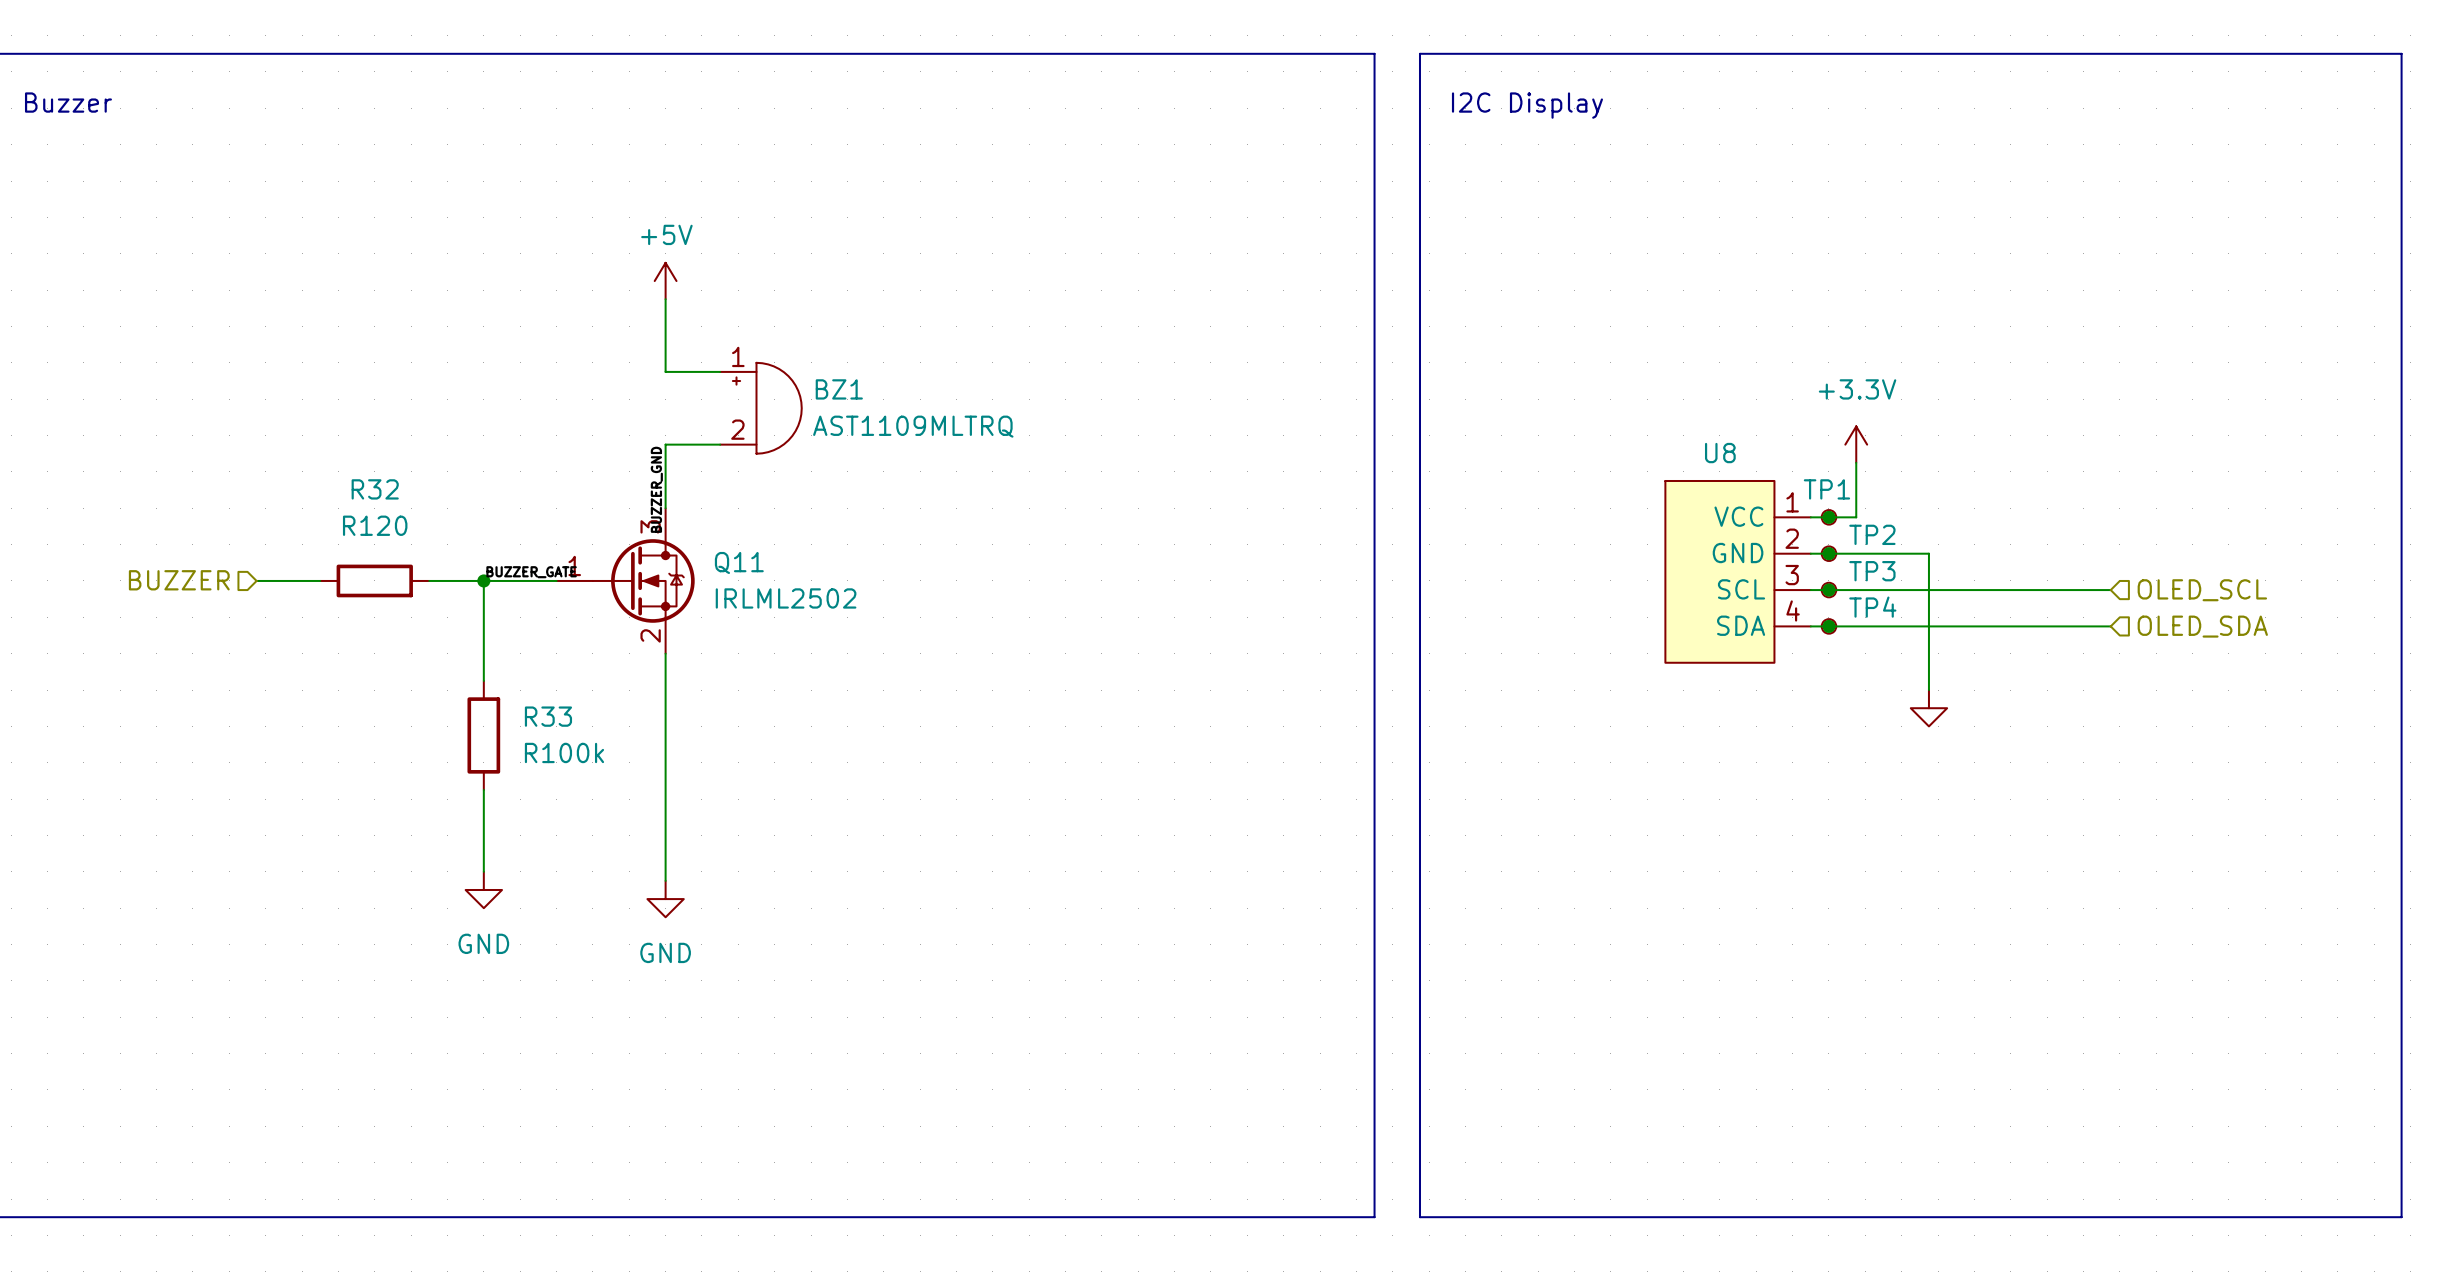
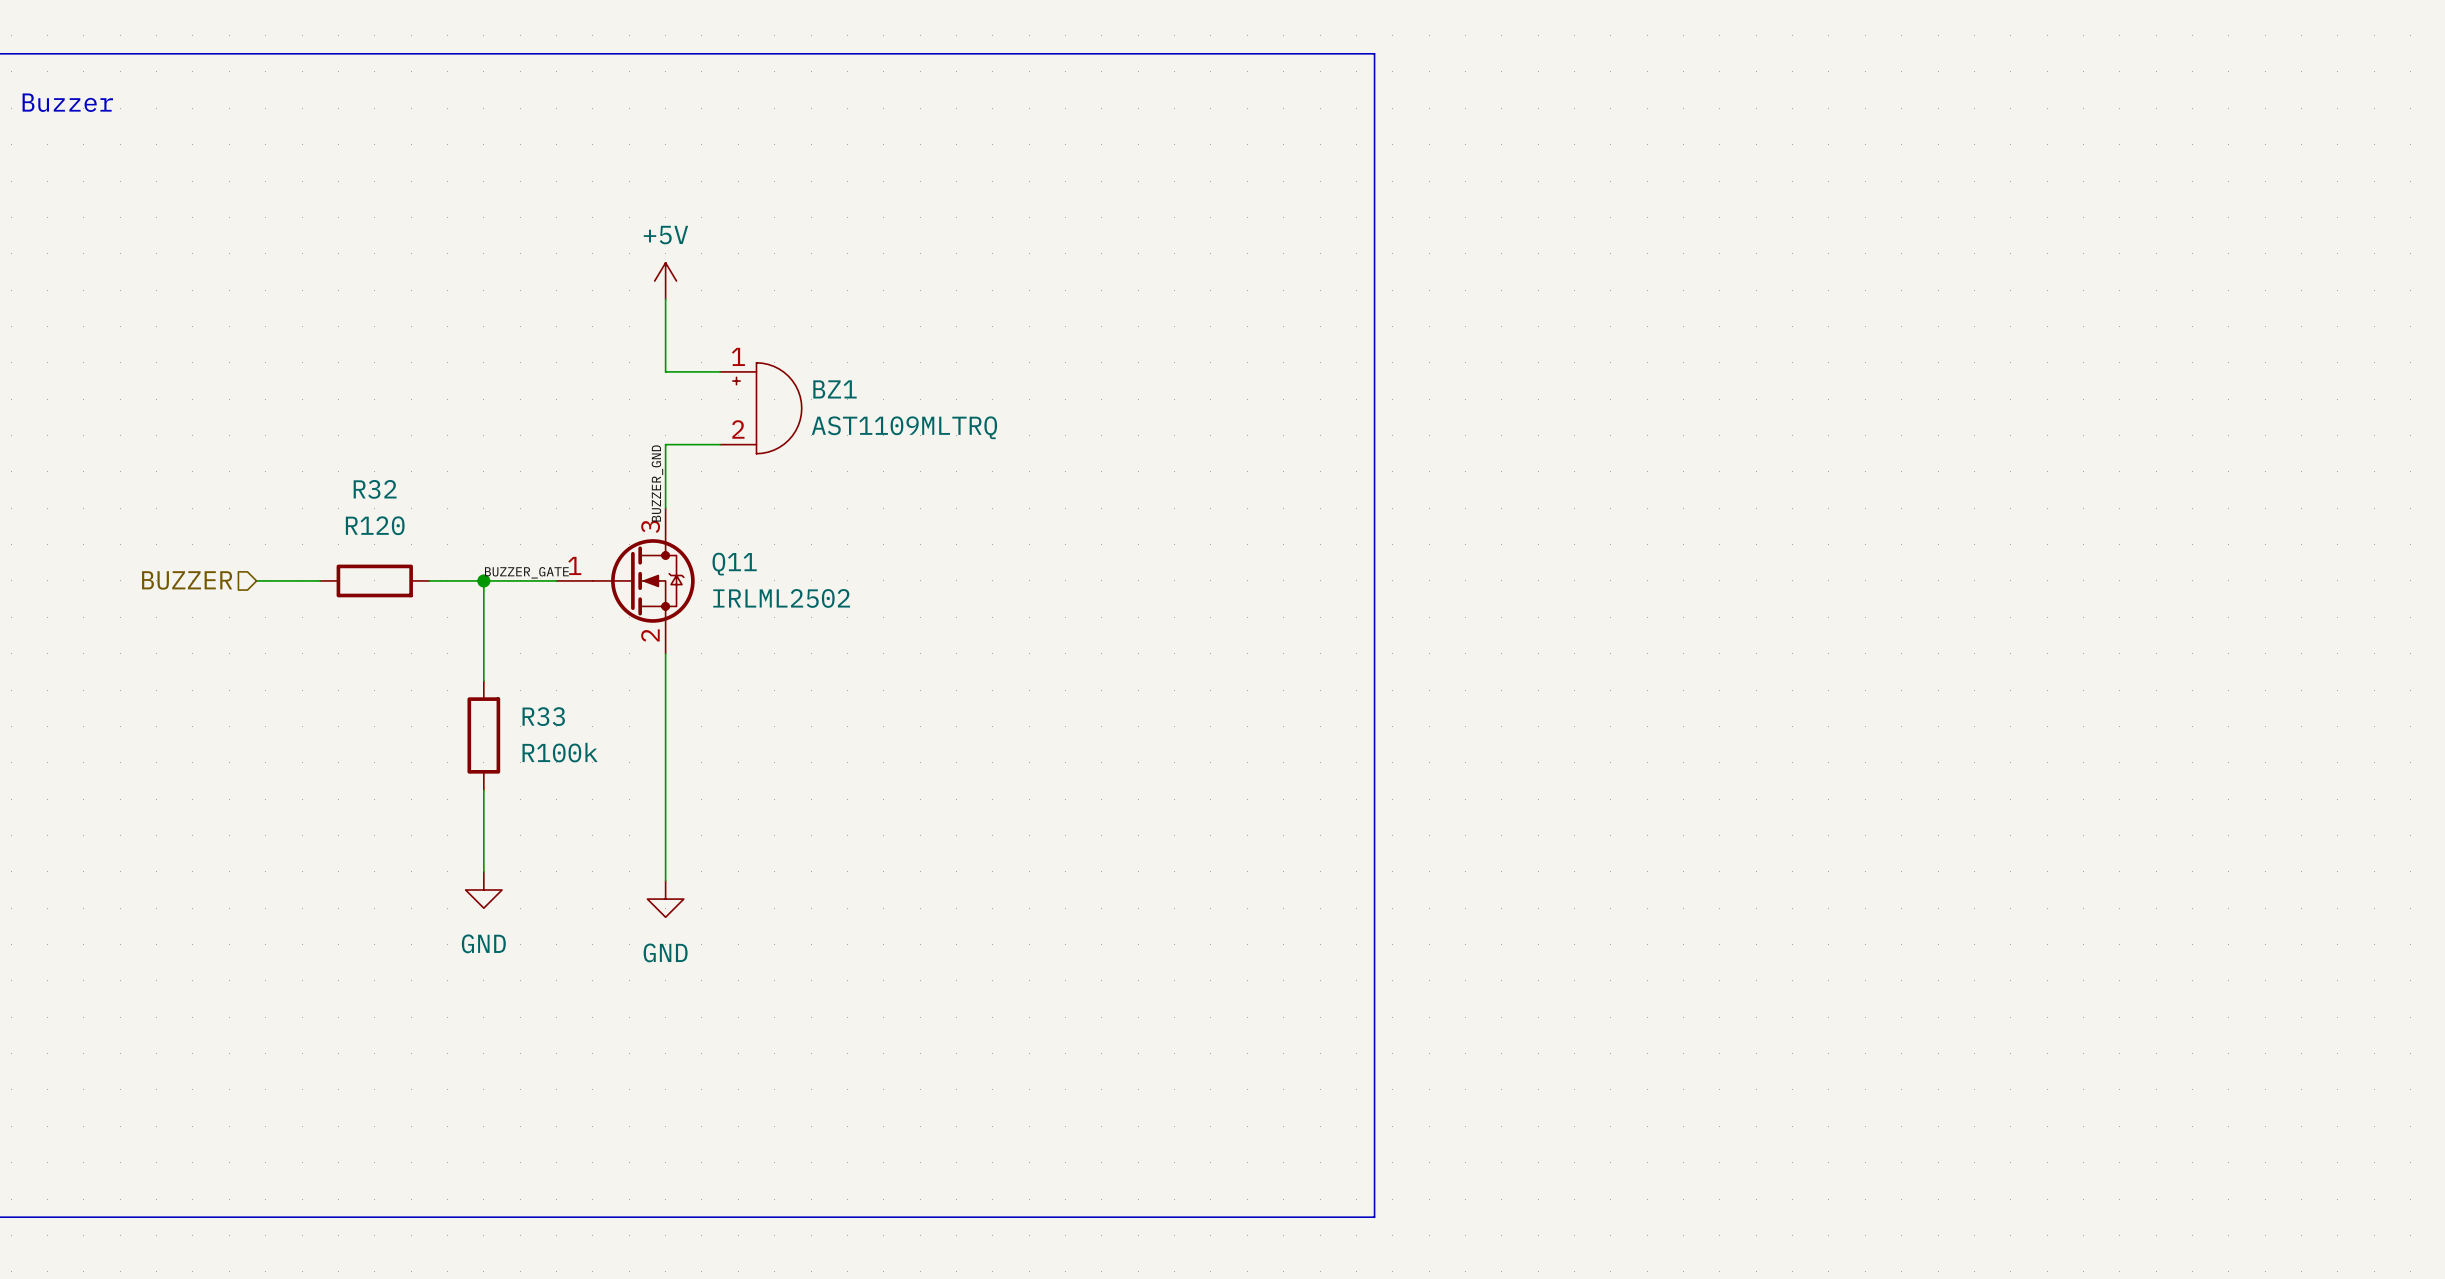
line: (1419, 53) (2401, 53) (2401, 1217) (1419, 1217) (1419, 53) -> none
text: I2C Display (1527, 105) -> none
power symbol: +3.3V (1856, 444) -> none
wire: (1856, 462) (1856, 517) (1810, 517) -> none
junction: (1828, 517) -> none
TP1: (1828, 517) -> none
wire: (1810, 553) (1928, 553) (1928, 690) -> none
junction: (1828, 553) -> none
TP2: (1828, 553) -> none
U8: (1738, 571) -> none
wire: (1810, 590) (2110, 590) -> none
junction: (1828, 590) -> none
TP3: (1828, 590) -> none
hierarchical label: OLED_SCL (2202, 590) -> none
wire: (1810, 626) (2110, 626) -> none
junction: (1828, 626) -> none
TP4: (1828, 626) -> none
hierarchical label: OLED_SDA (2202, 626) -> none
power symbol: (1928, 708) -> none

